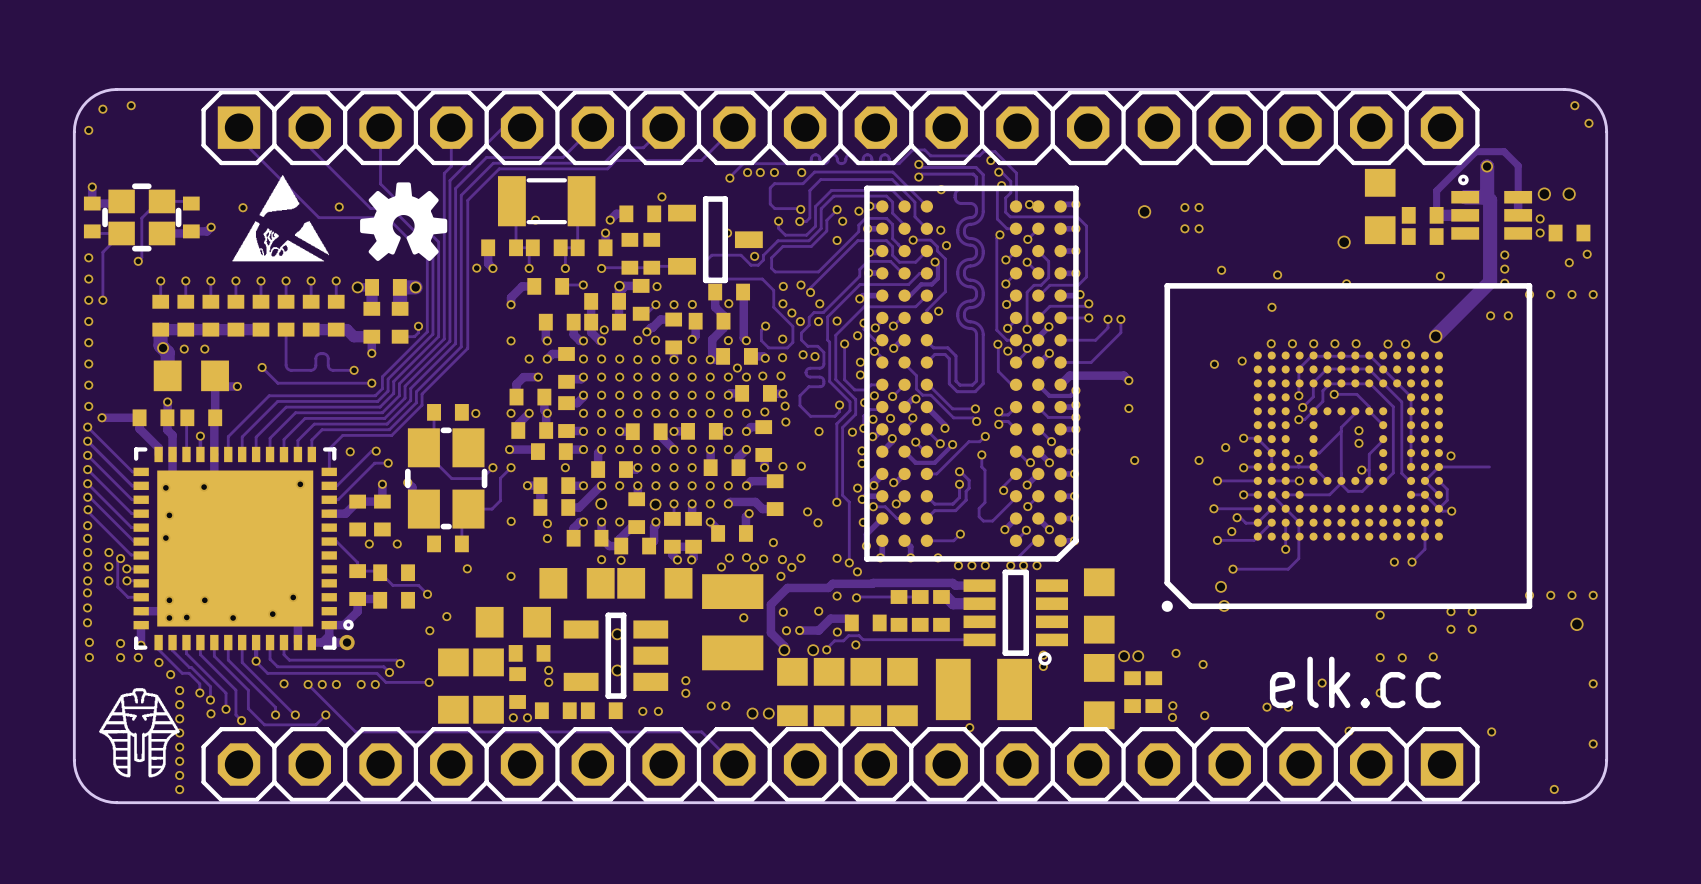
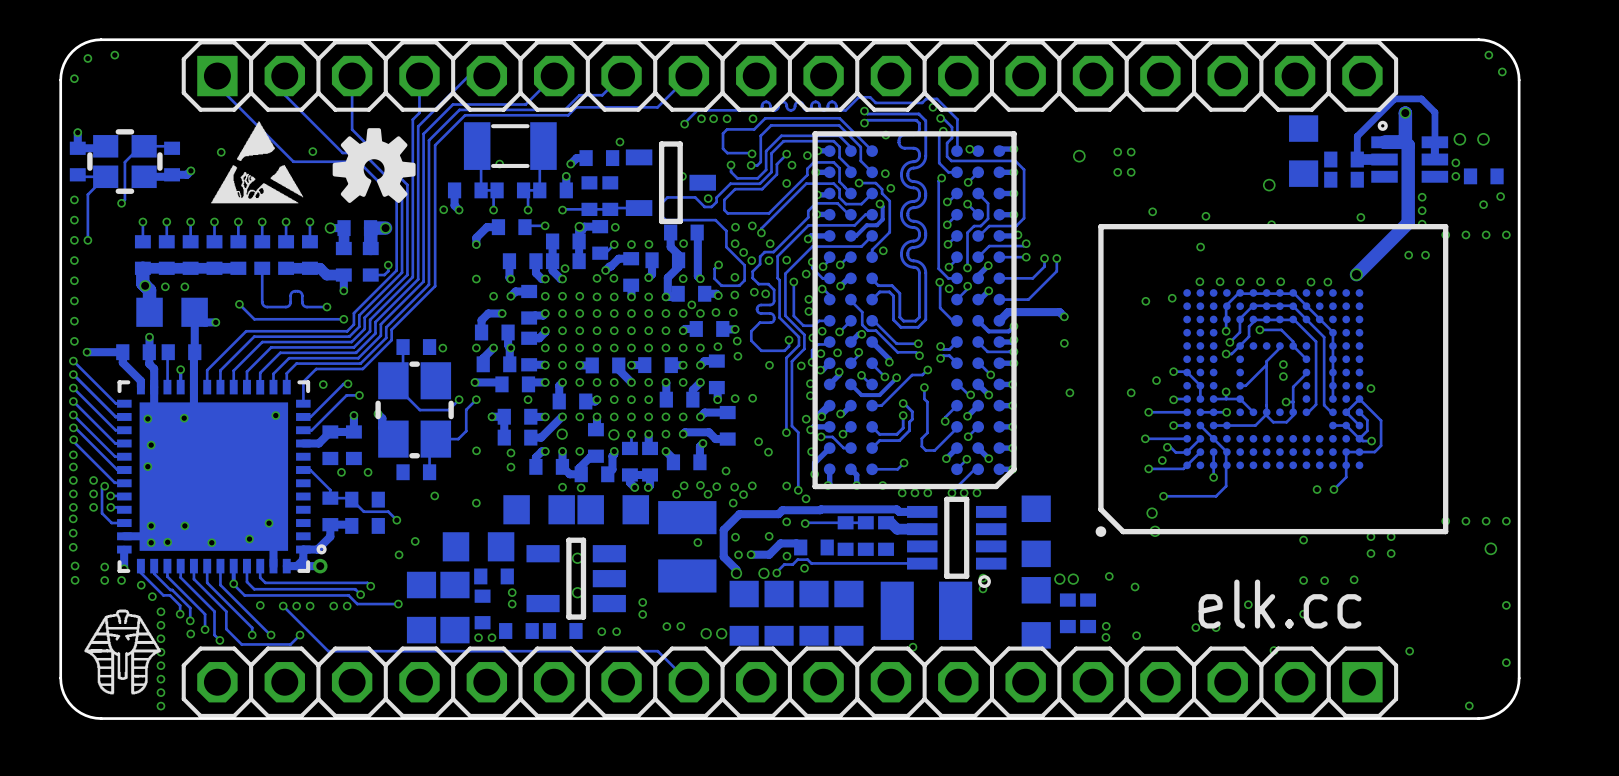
track: (1489, 466) (1438, 466) -> (1346, 452) (1374, 452) (1381, 445) (1381, 420) (1359, 399)

